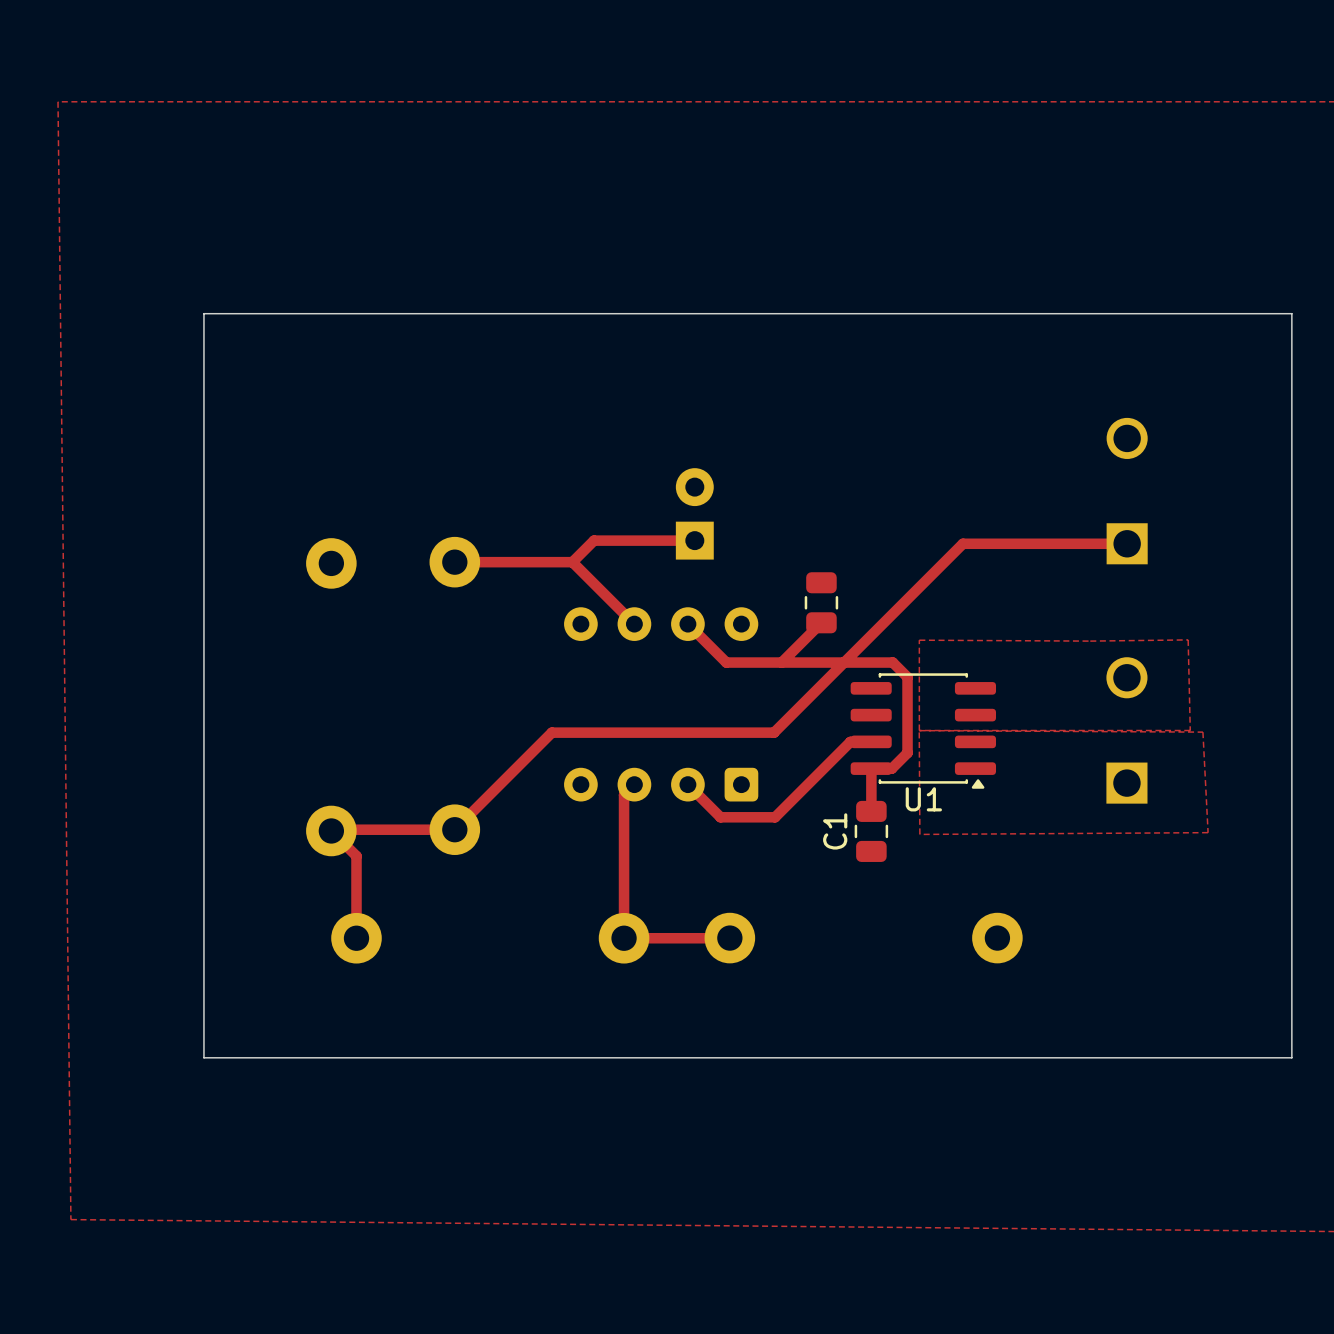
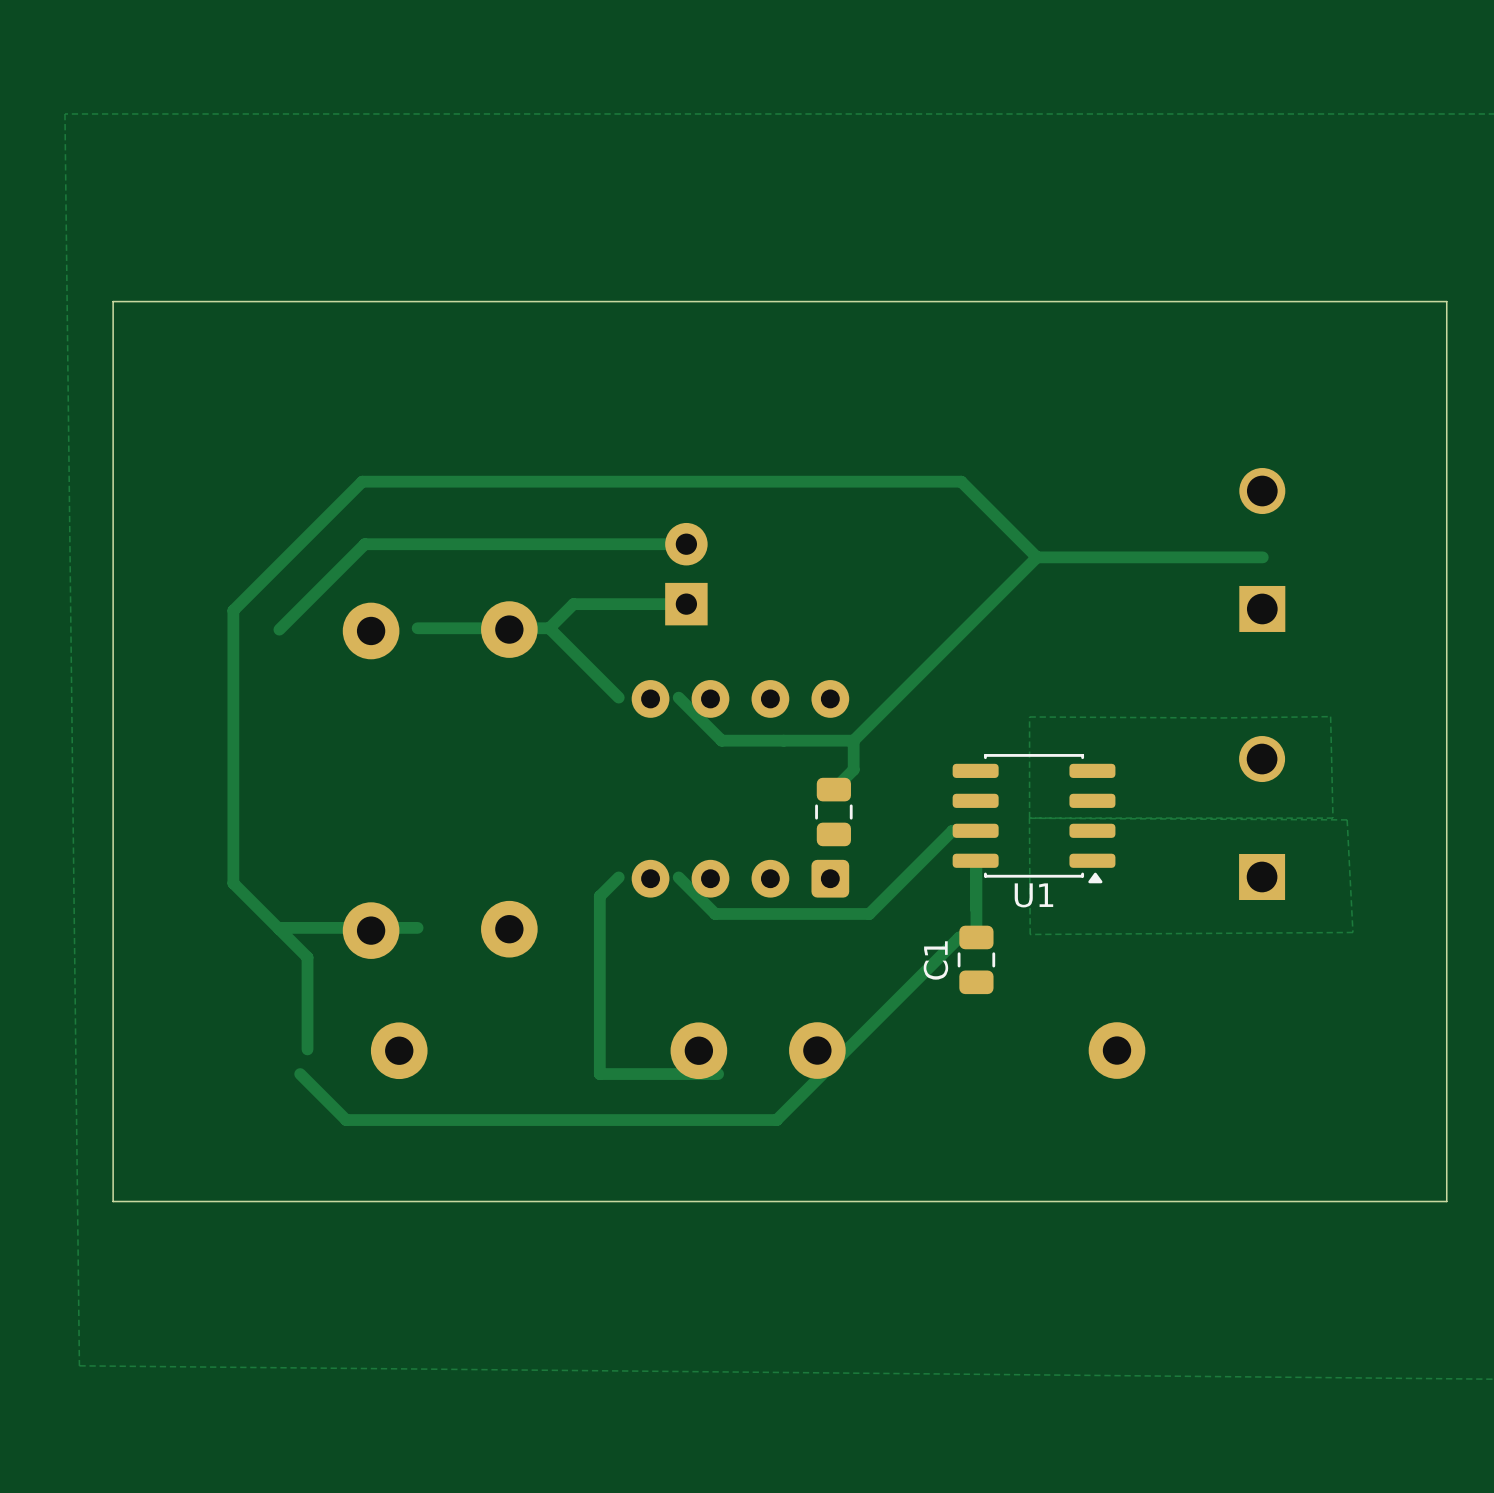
board edge: (1291, 313) (203, 313) (203, 1057) (1291, 1057) -> (1446, 351) (1446, 301) (113, 301) (113, 1201) (1446, 1201) (1446, 1184)
track: none -> (686, 544) (364, 544) (279, 629)
track: none -> (1036, 557) (961, 481) (362, 481) (233, 610) (233, 883) (307, 957) (307, 1049)
track: none -> (1036, 557) (853, 740)
track: none -> (1036, 557) (1262, 557)
part position: (694, 513) -> (686, 574)
track: (694, 540) (594, 540) (572, 562) -> (686, 604) (573, 604) (549, 628)
track: (1127, 543) (962, 543) (774, 732) (551, 732) (454, 829) (332, 829) (331, 830) (356, 856) (356, 938) -> none
track: (454, 562) (572, 562) -> (417, 628) (549, 628)
track: (572, 562) (634, 624) -> (549, 628) (618, 697)
part position: (821, 602) -> (833, 812)
track: none -> (678, 697) (721, 740) (853, 740)
track: (821, 622) (781, 662) -> none
track: (687, 624) (726, 662) (892, 662) (907, 677) (907, 752) (891, 768) (871, 768) -> (300, 1074) (346, 1120) (776, 1120) (959, 937) (976, 937) (975, 861)
track: none -> (853, 740) (853, 769) (833, 789)
track: none -> (618, 877) (599, 896) (599, 1074) (718, 1074)
track: (634, 784) (624, 795) (624, 938) (729, 938) -> none
track: (687, 784) (720, 817) (776, 816) -> (678, 877) (715, 913) (869, 913)
track: none -> (417, 927) (279, 929)
C1 position: (871, 831) -> (976, 959)

